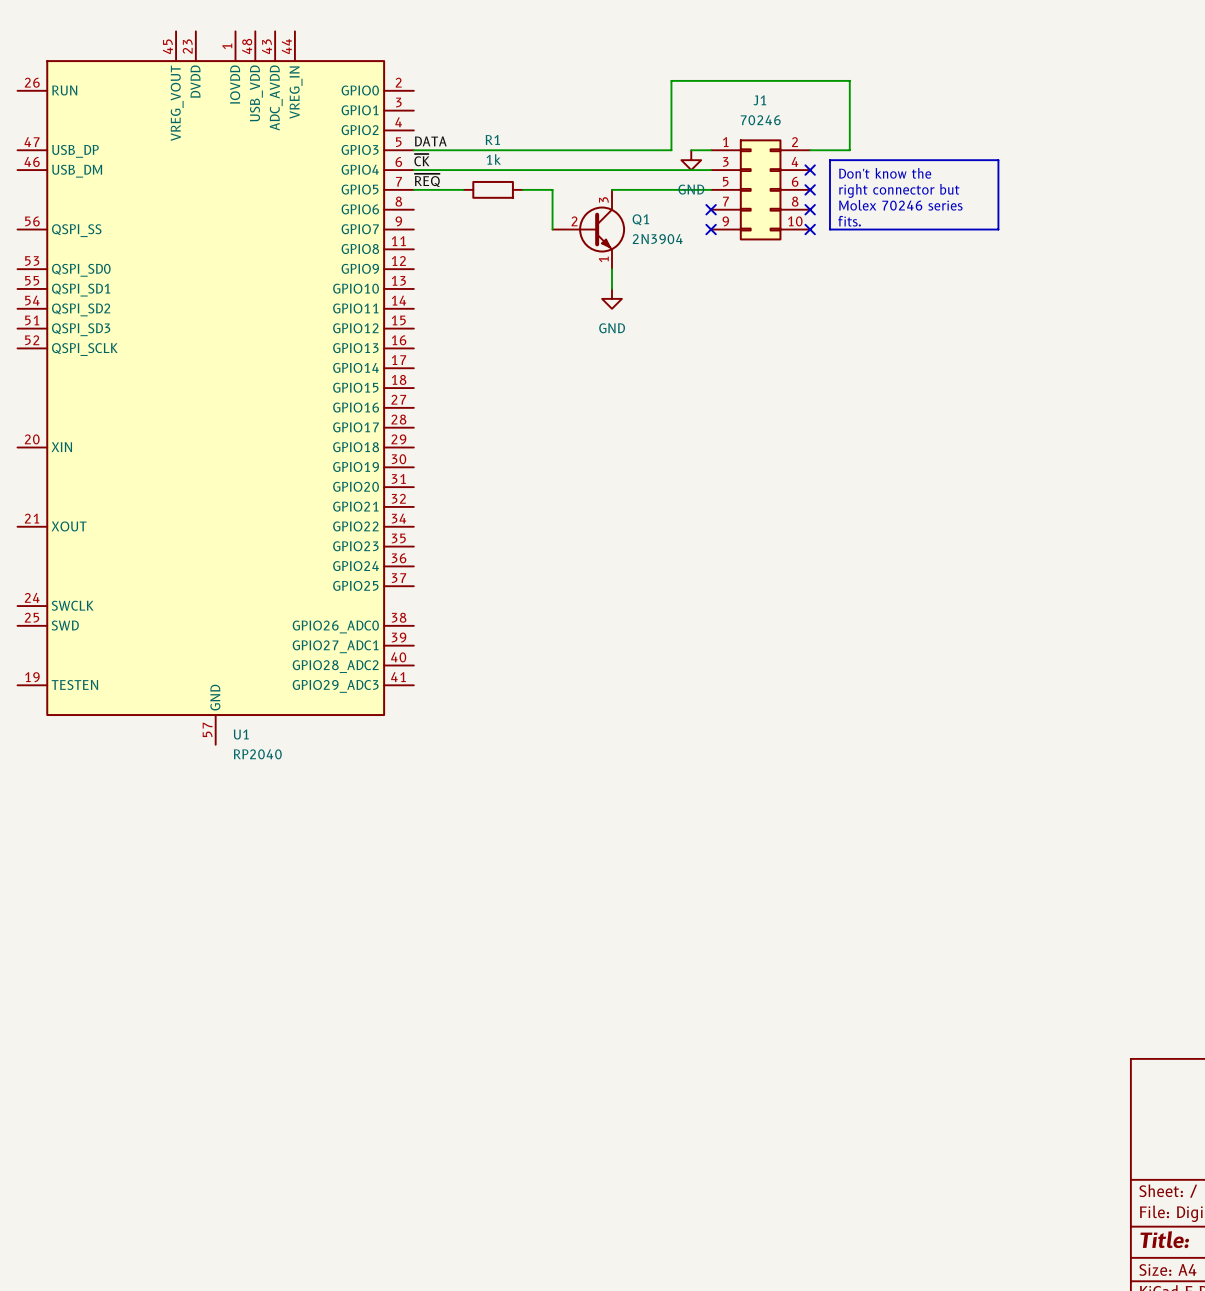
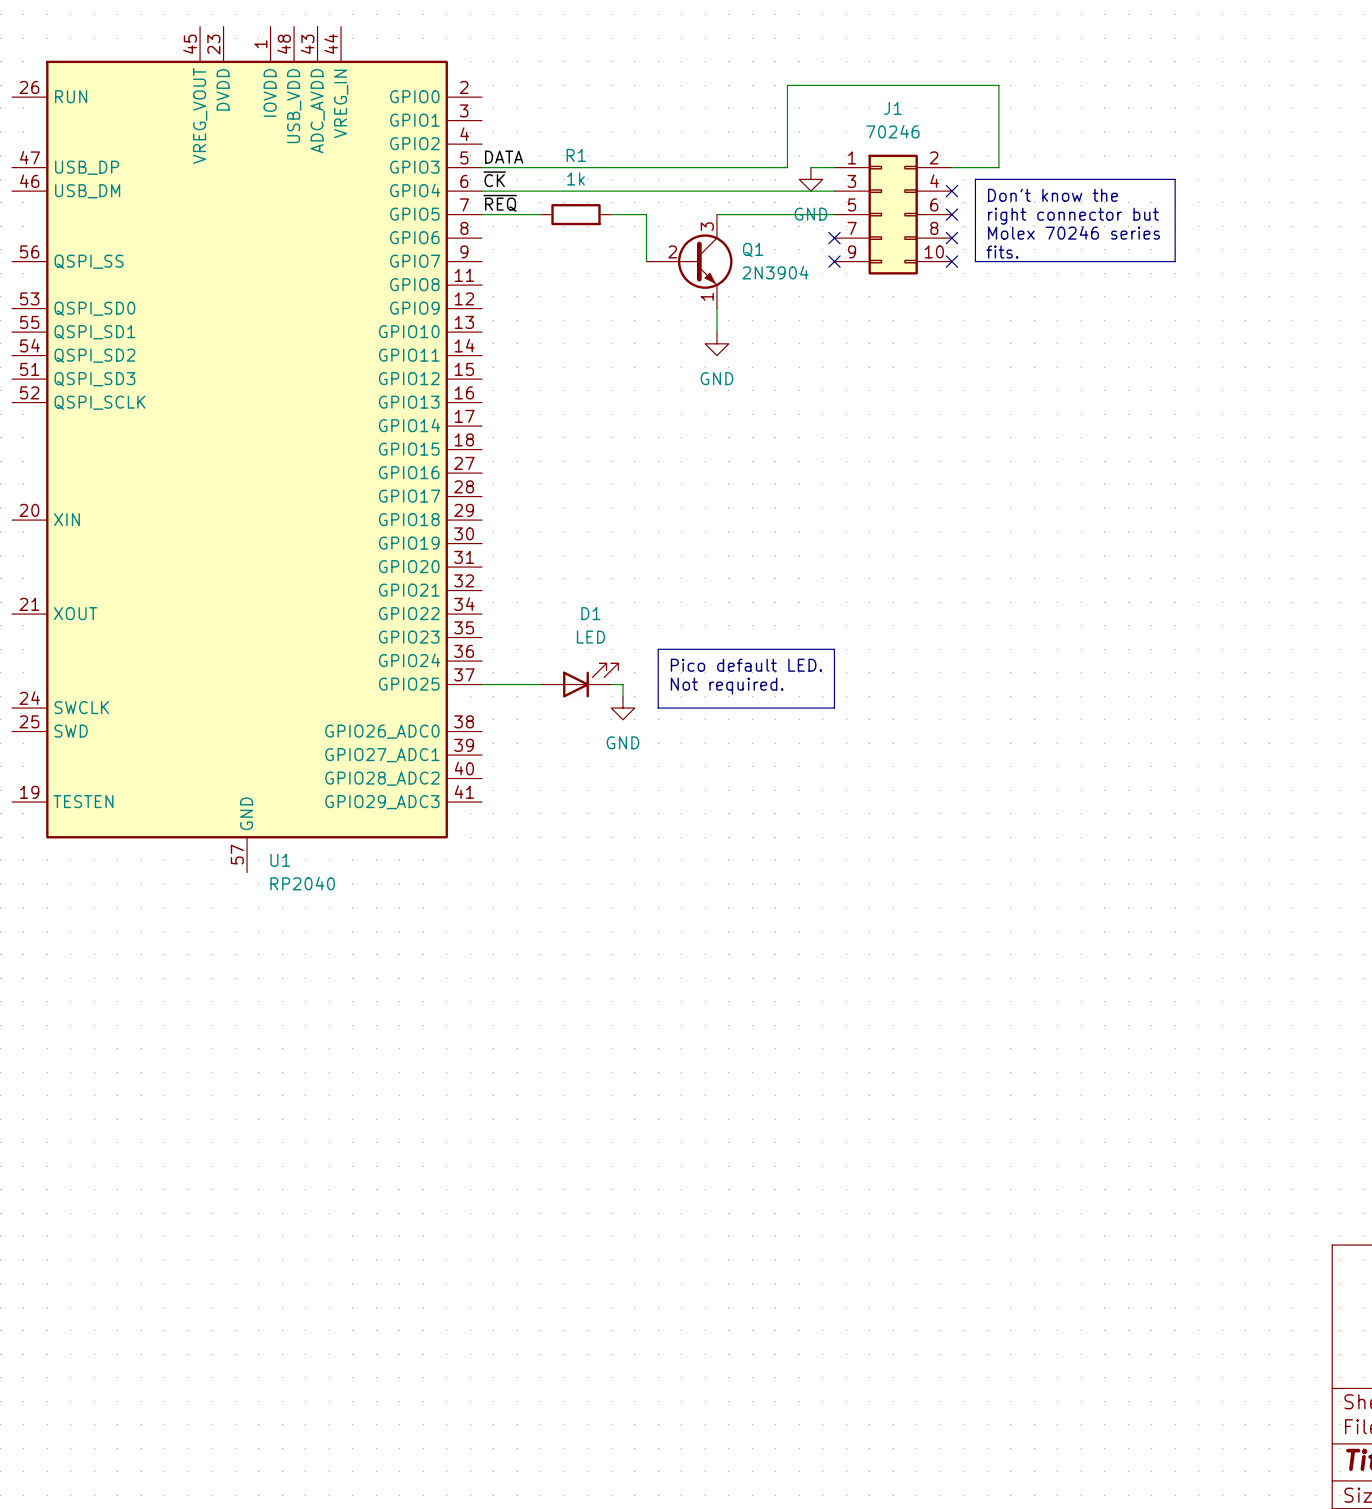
line: none -> (658, 649) (834, 649) (834, 708) (658, 708) (658, 649)
text: none -> Pico default LED. (746, 665)
D1: none -> LED (579, 680)
wire: none -> (482, 684) (540, 684)
wire: none -> (611, 684) (622, 684) (622, 696)
text: none -> Not required. (727, 686)
power symbol: none -> GND (622, 708)

